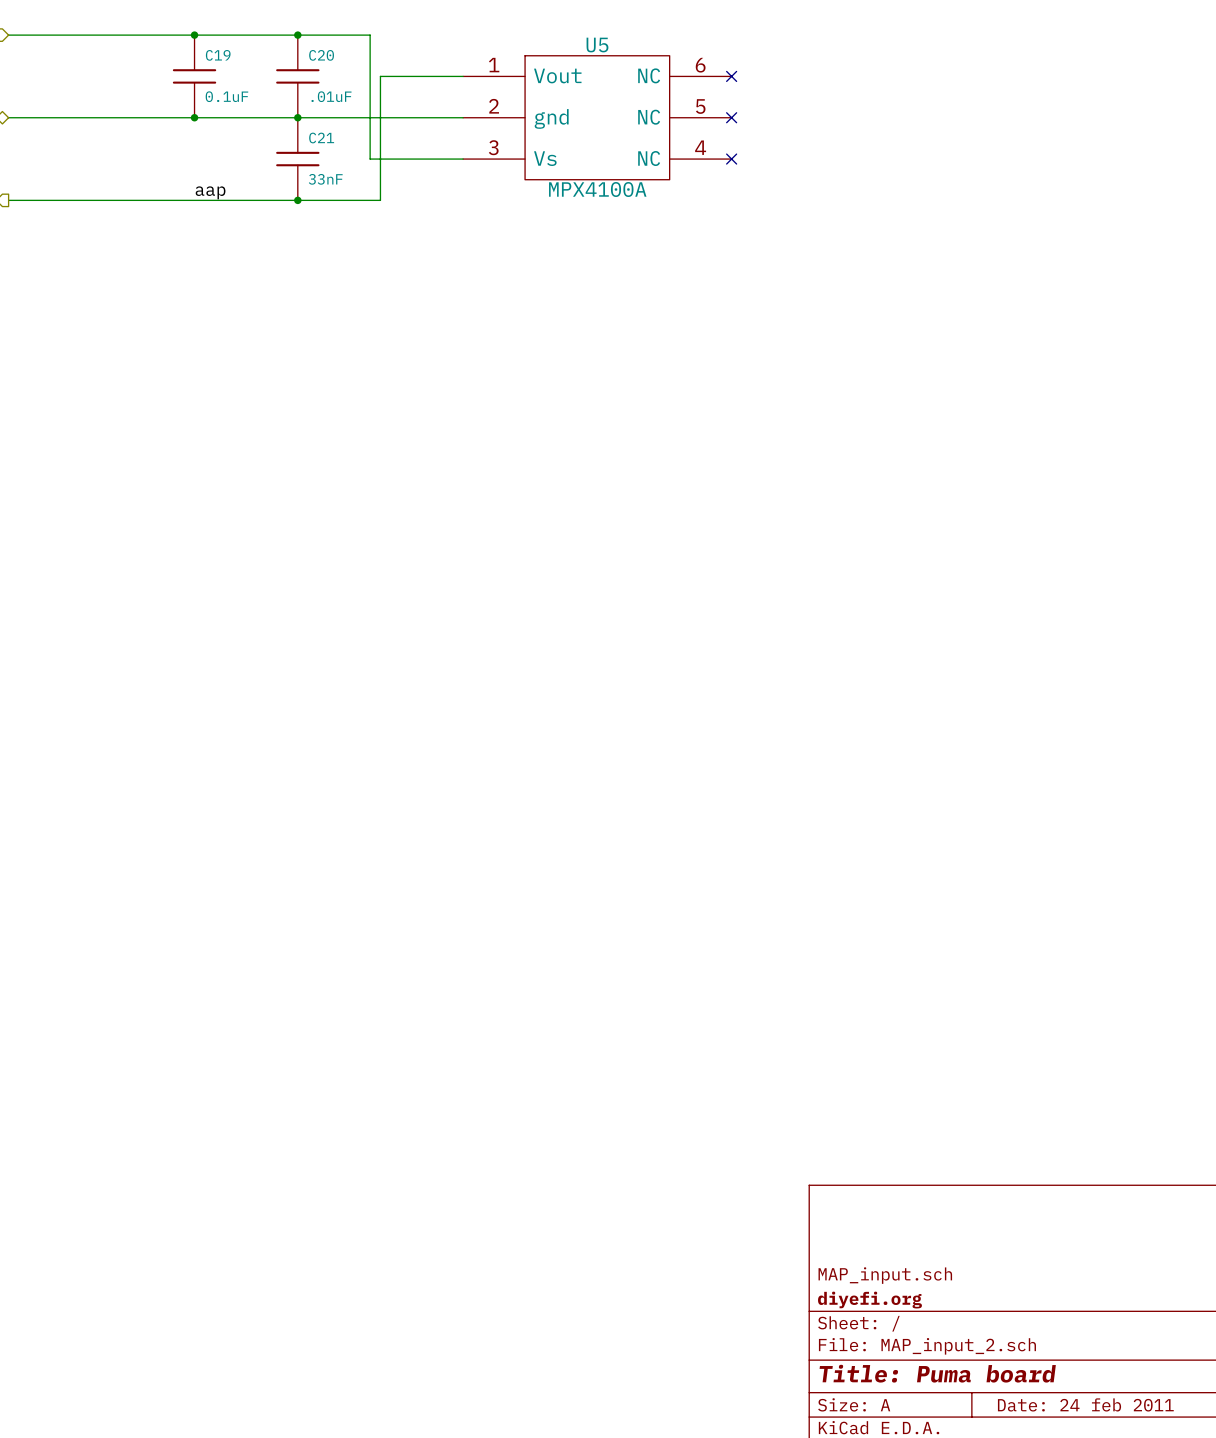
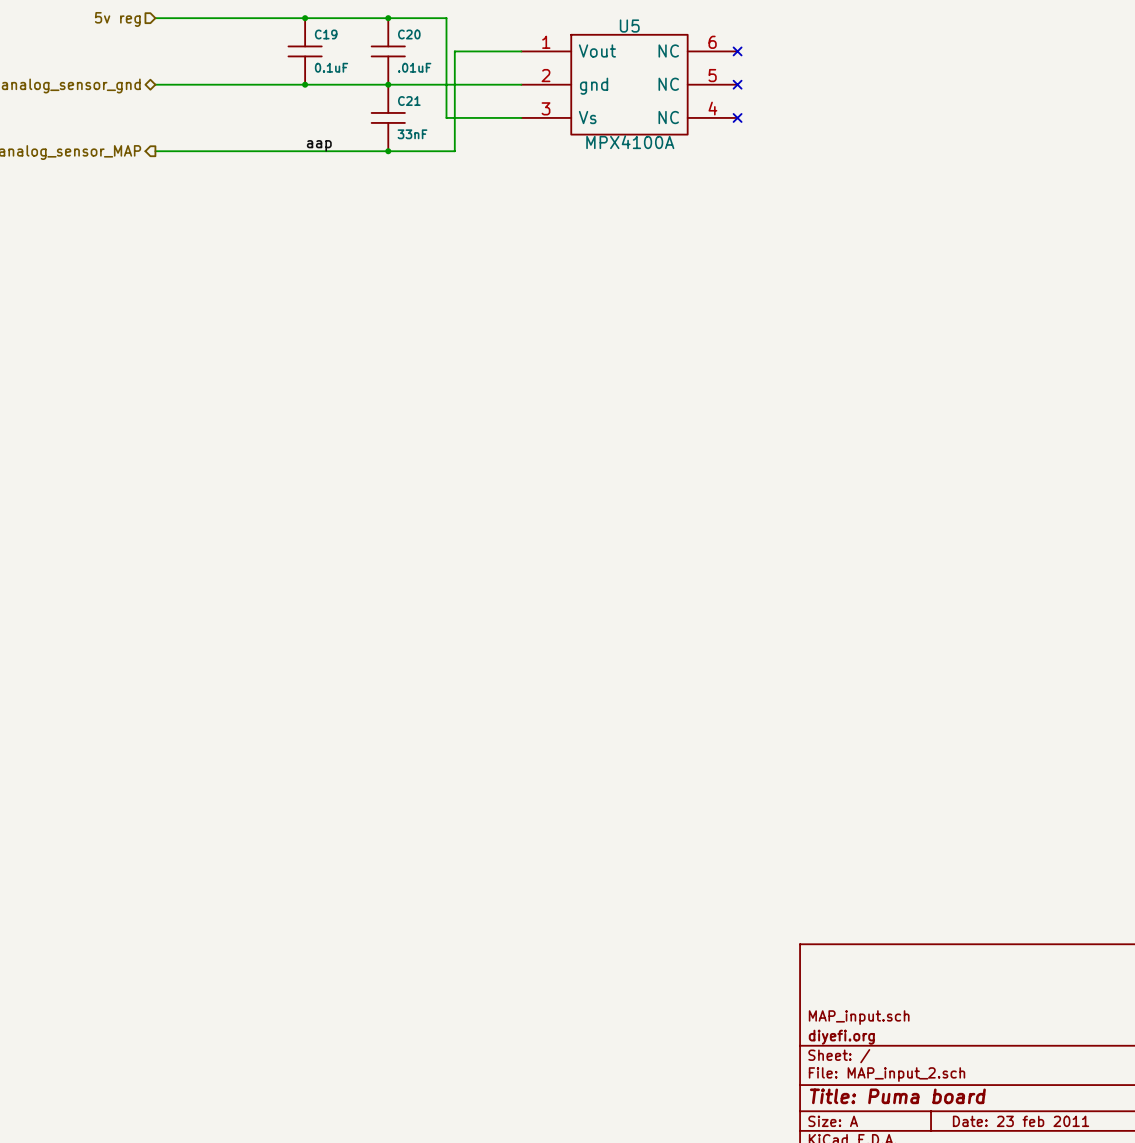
title block: Date: 24 feb 2011 (1085, 1404) -> Date: 23 feb 2011 (1021, 1121)

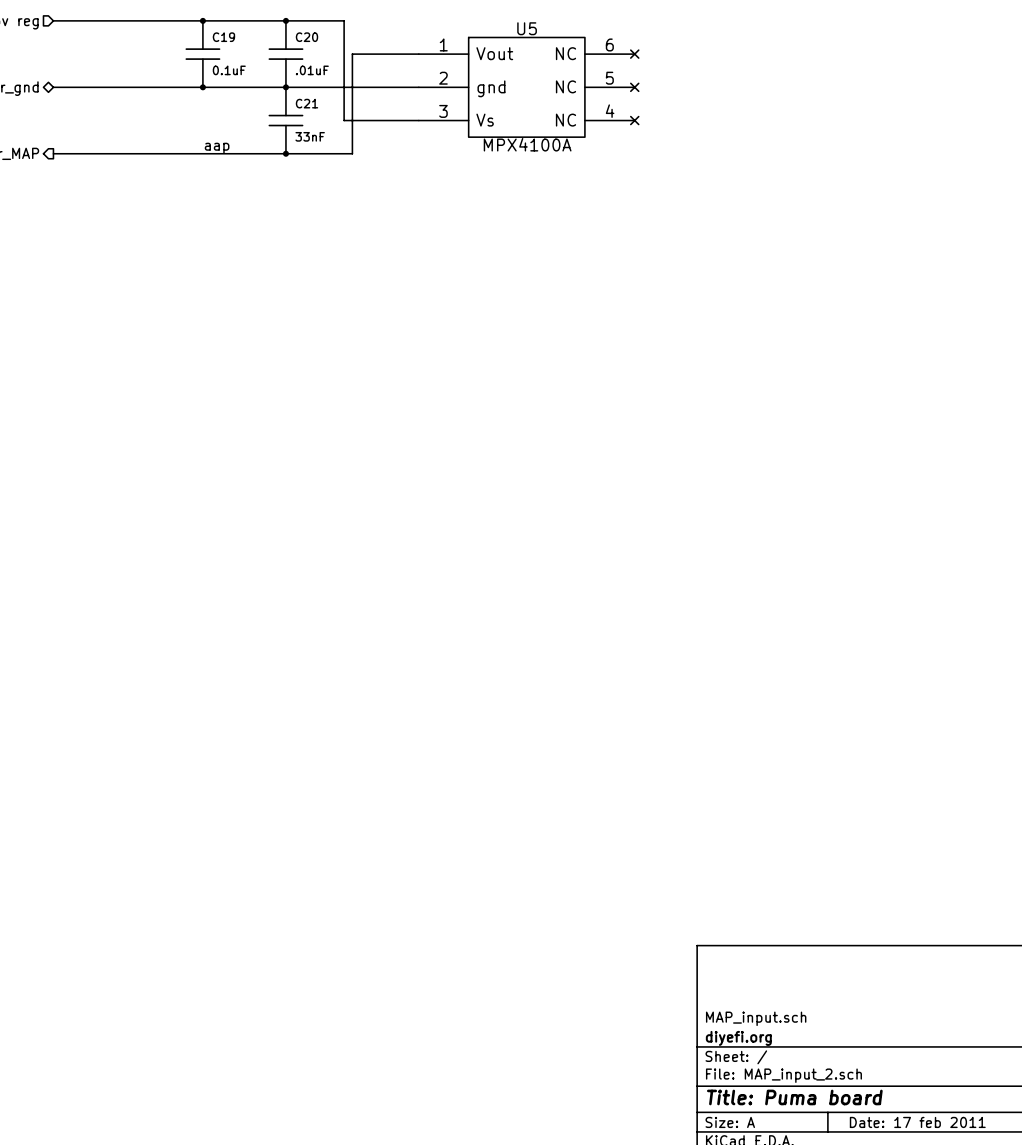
title block: Date: 23 feb 2011 (1021, 1121) -> Date: 17 feb 2011 (917, 1122)

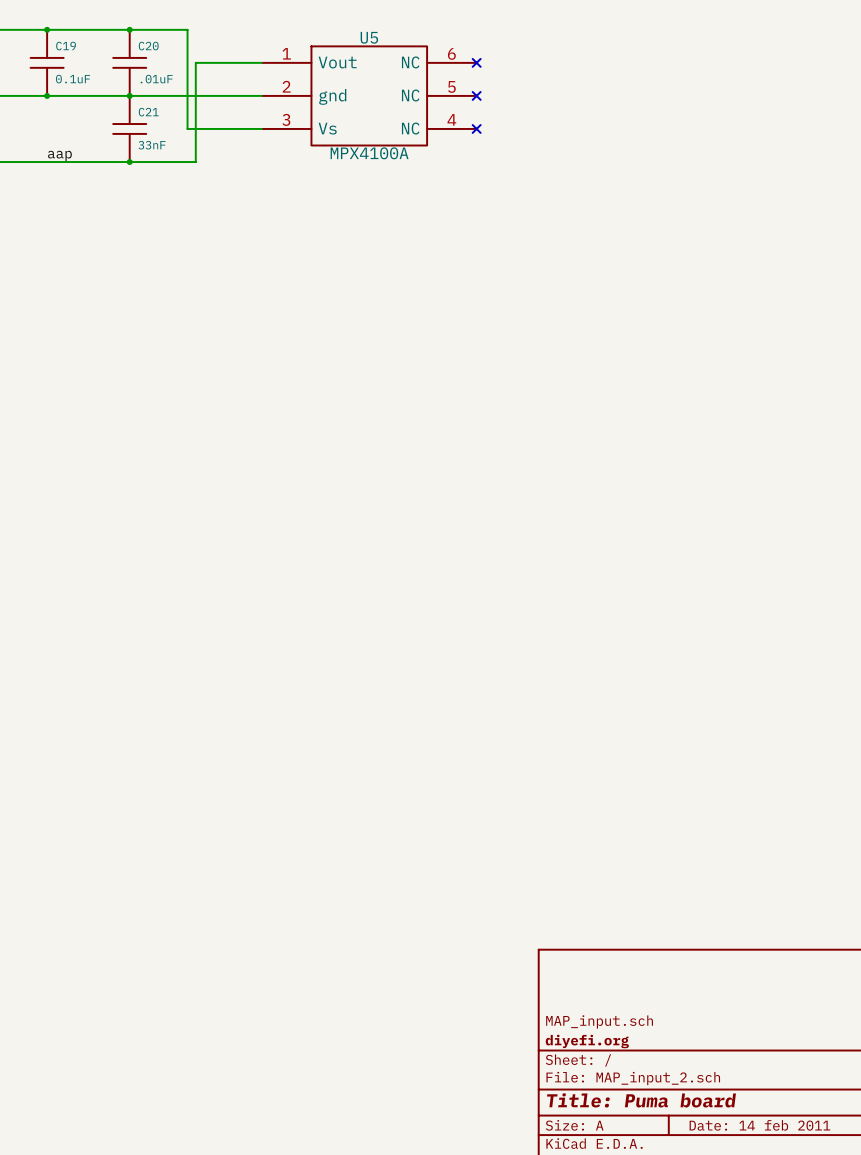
title block: Date: 17 feb 2011 (917, 1122) -> Date: 14 feb 2011 (759, 1125)

